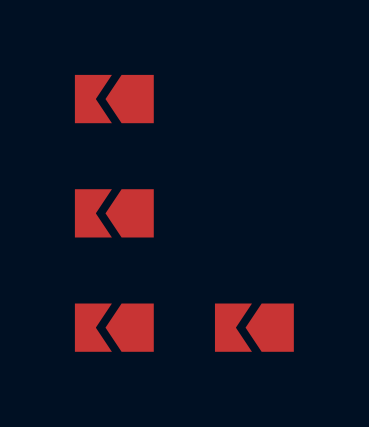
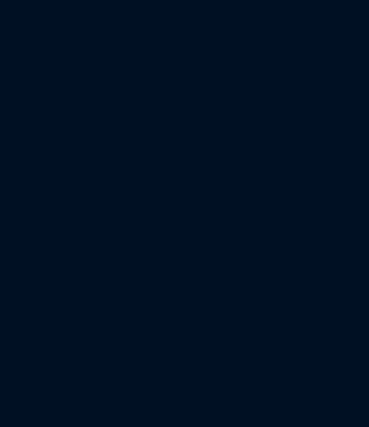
part: (114, 99) -> none
part: (114, 213) -> none
part: (114, 327) -> none
part: (254, 327) -> none

